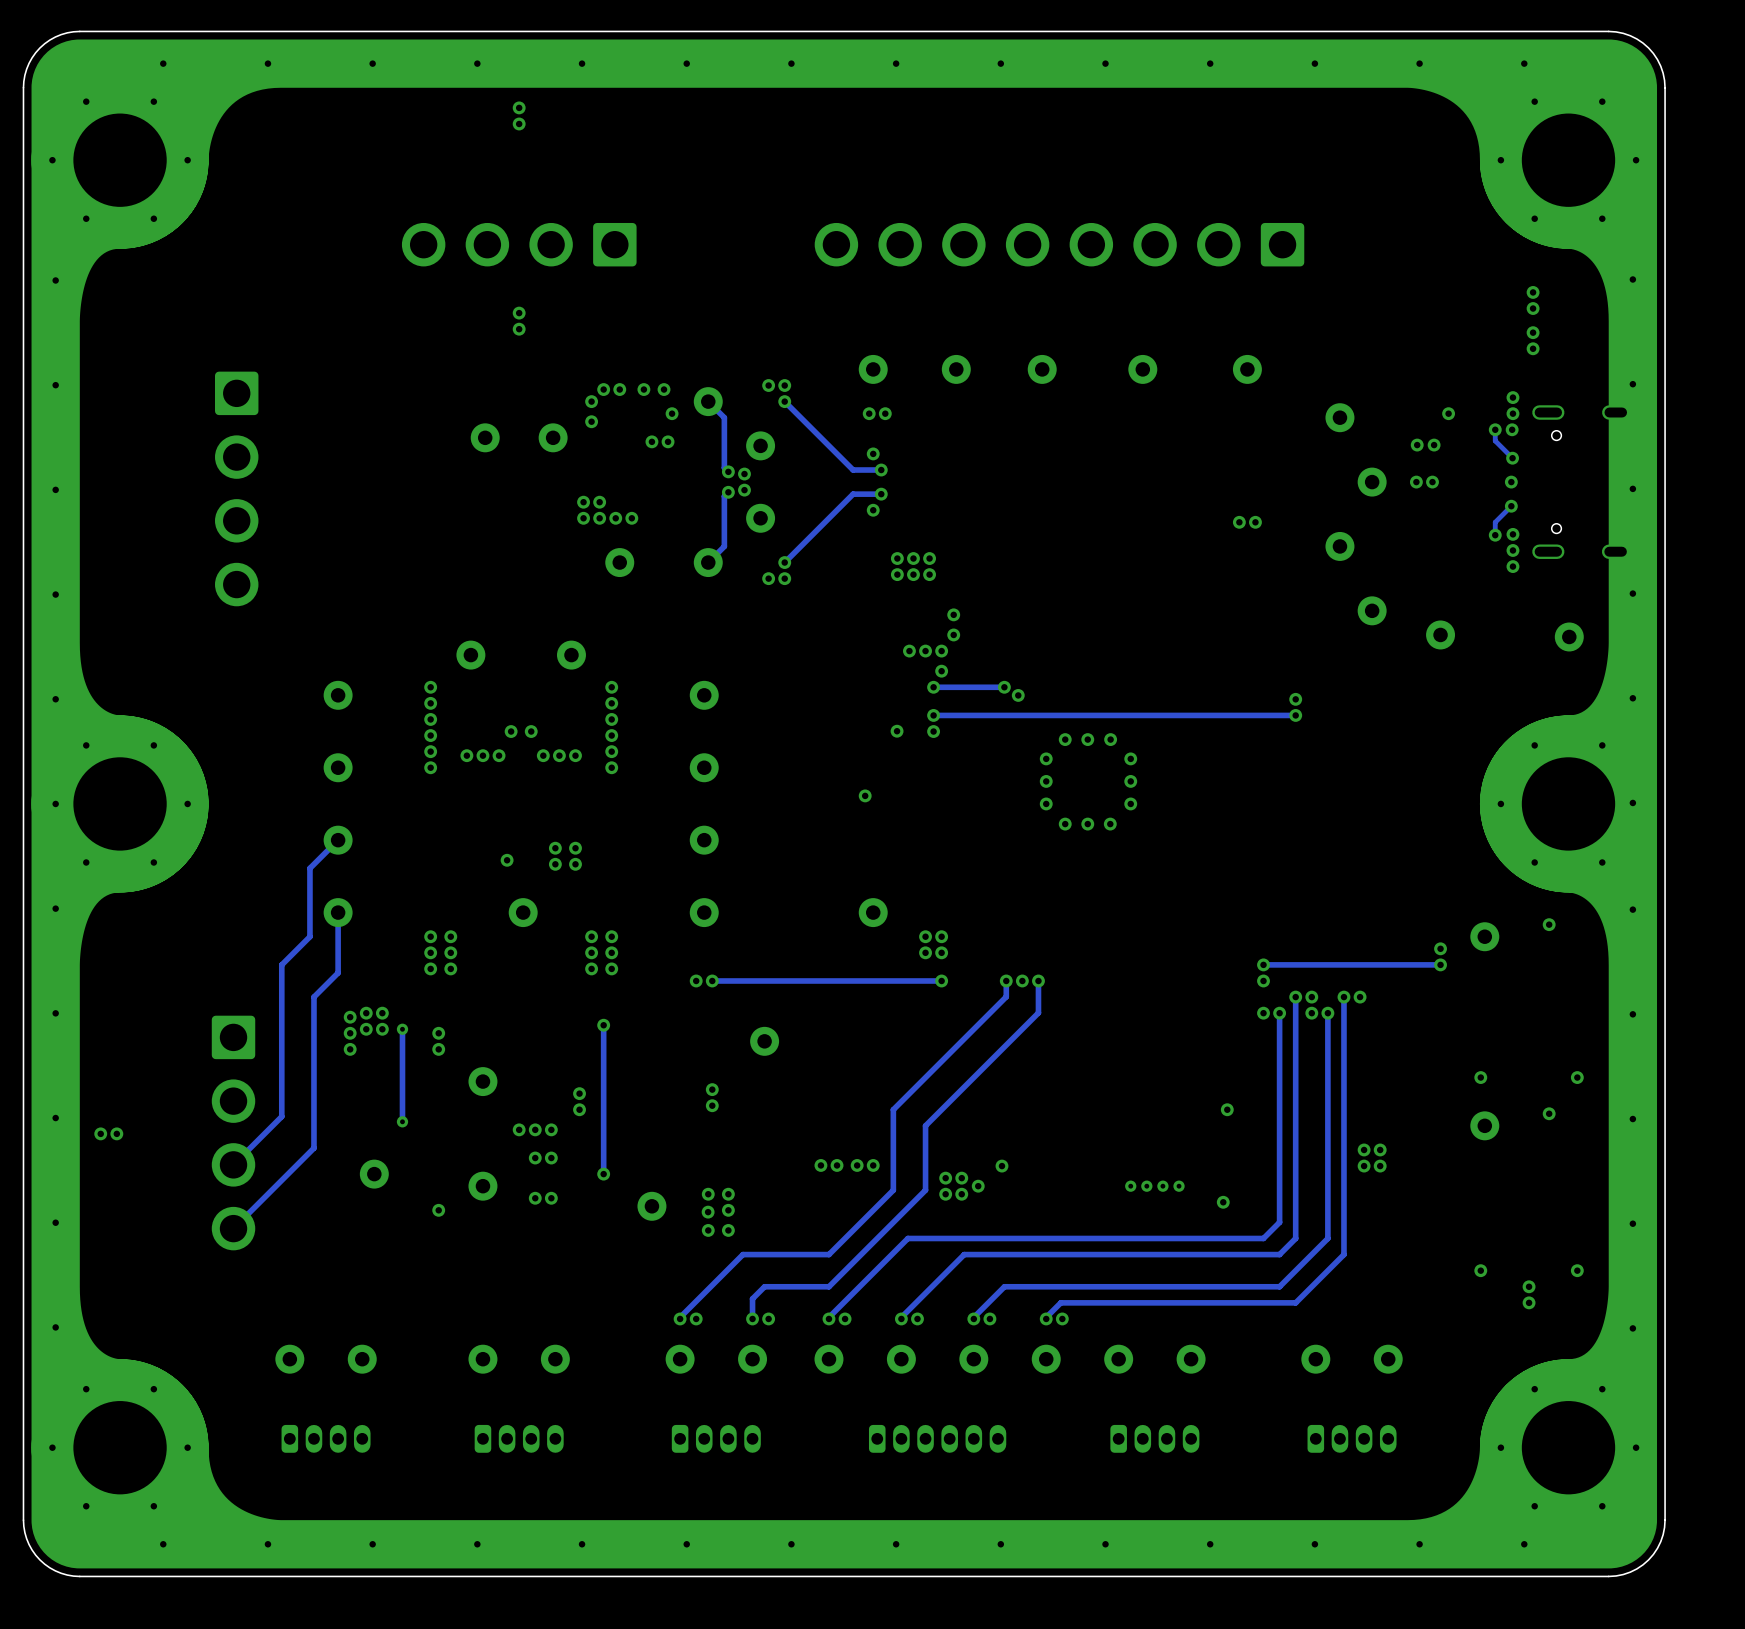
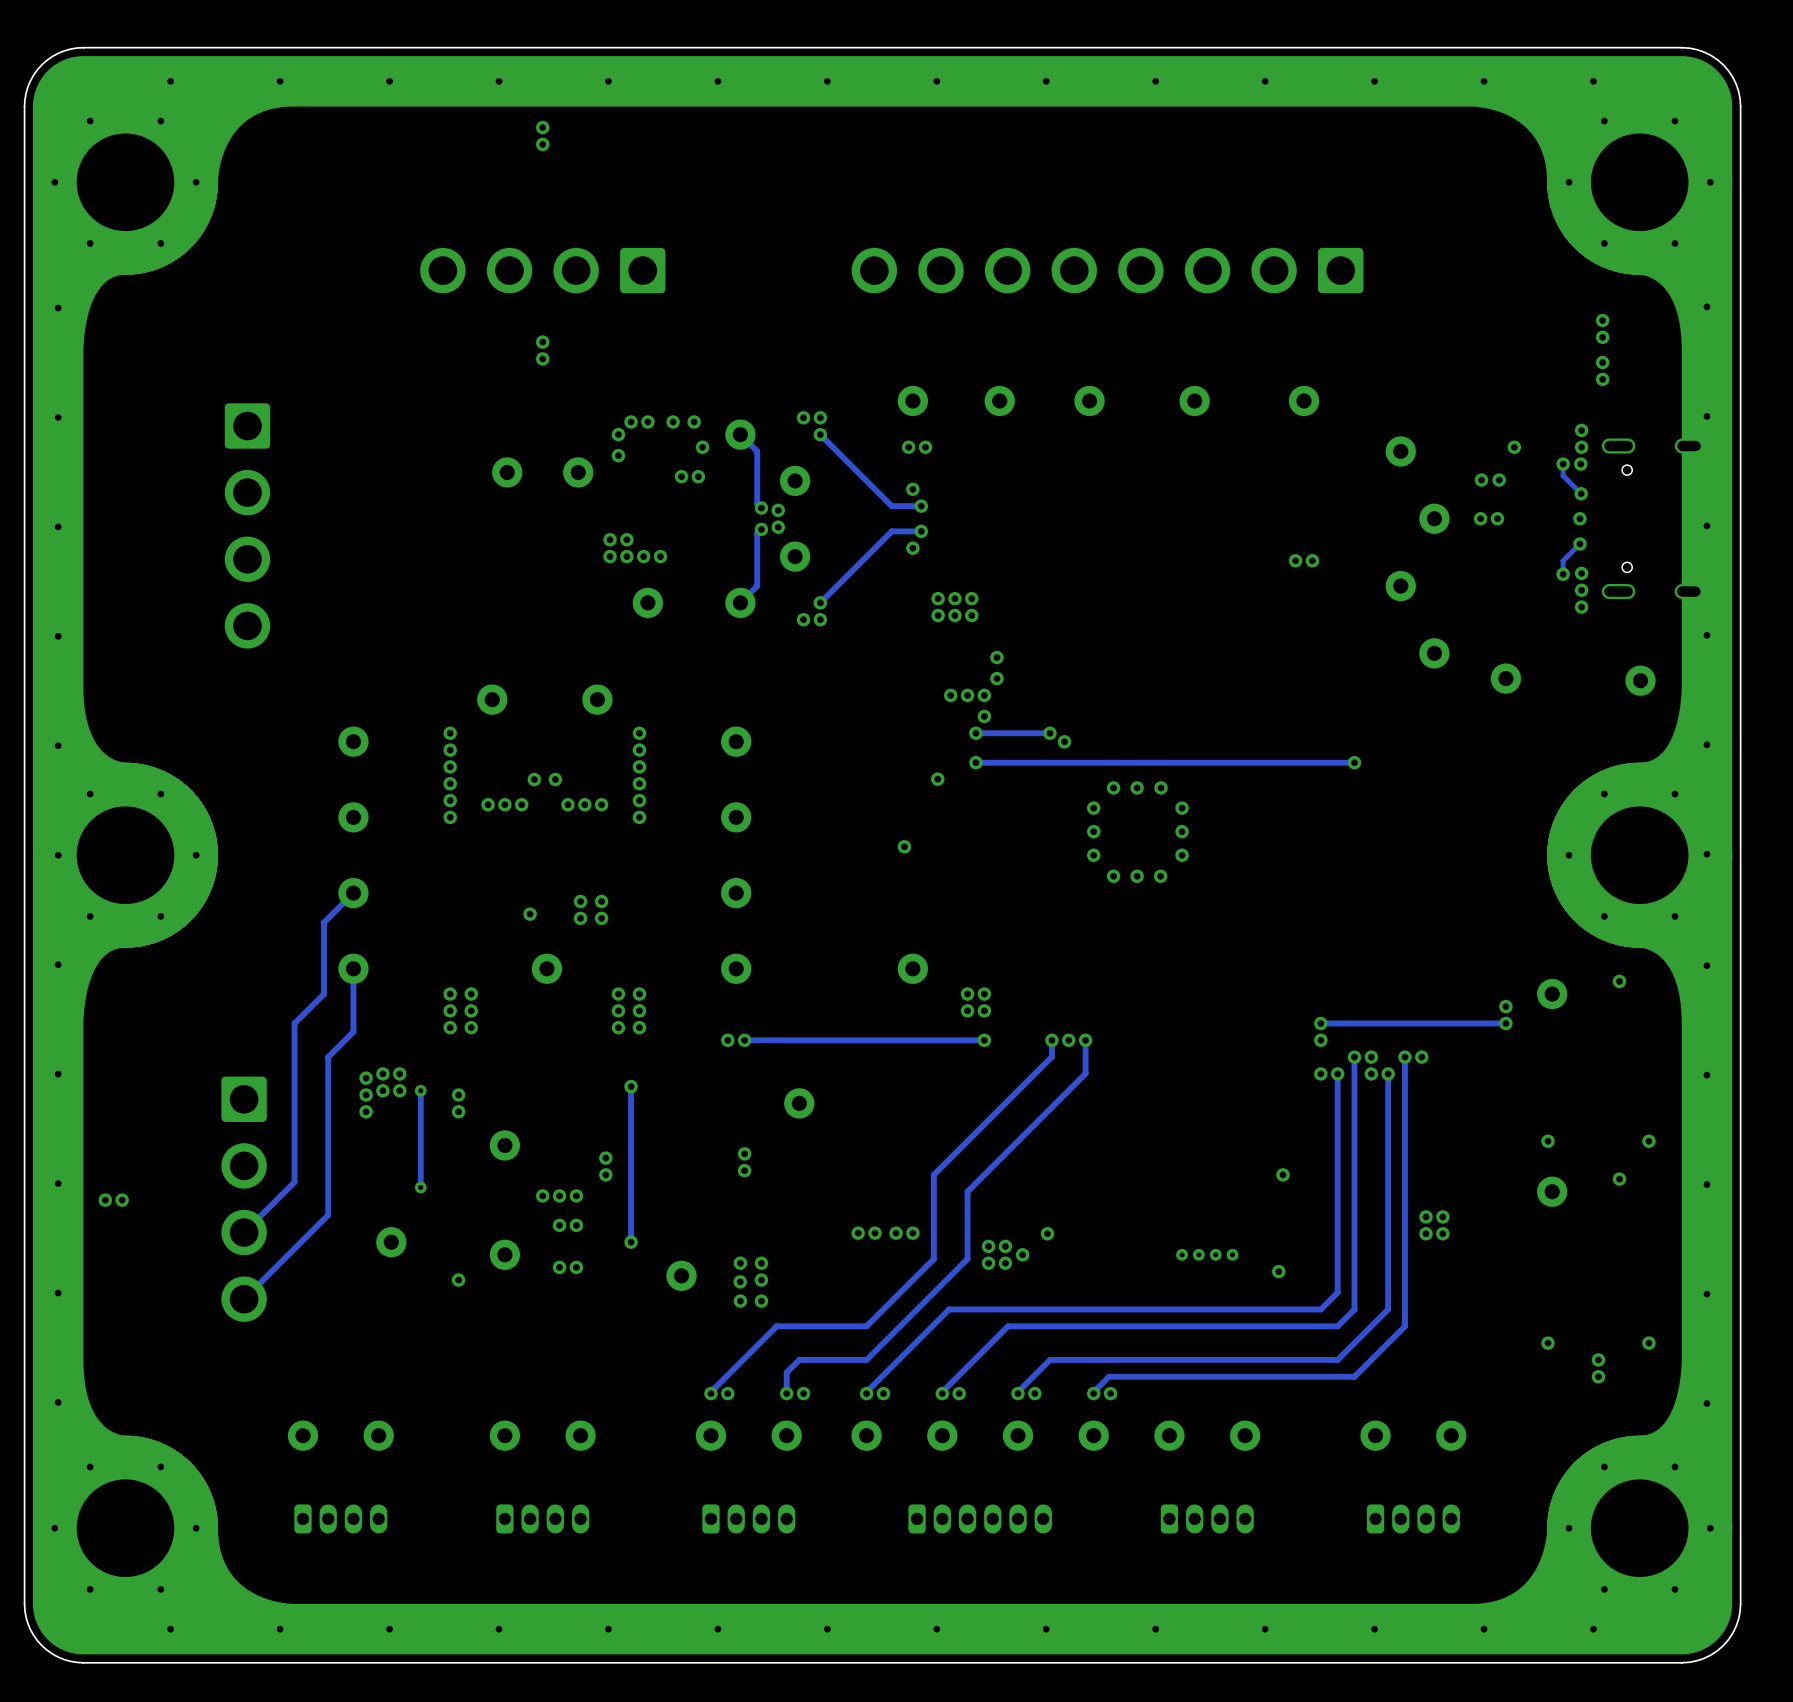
via: (1295, 699) -> none
via: (933, 731) -> none

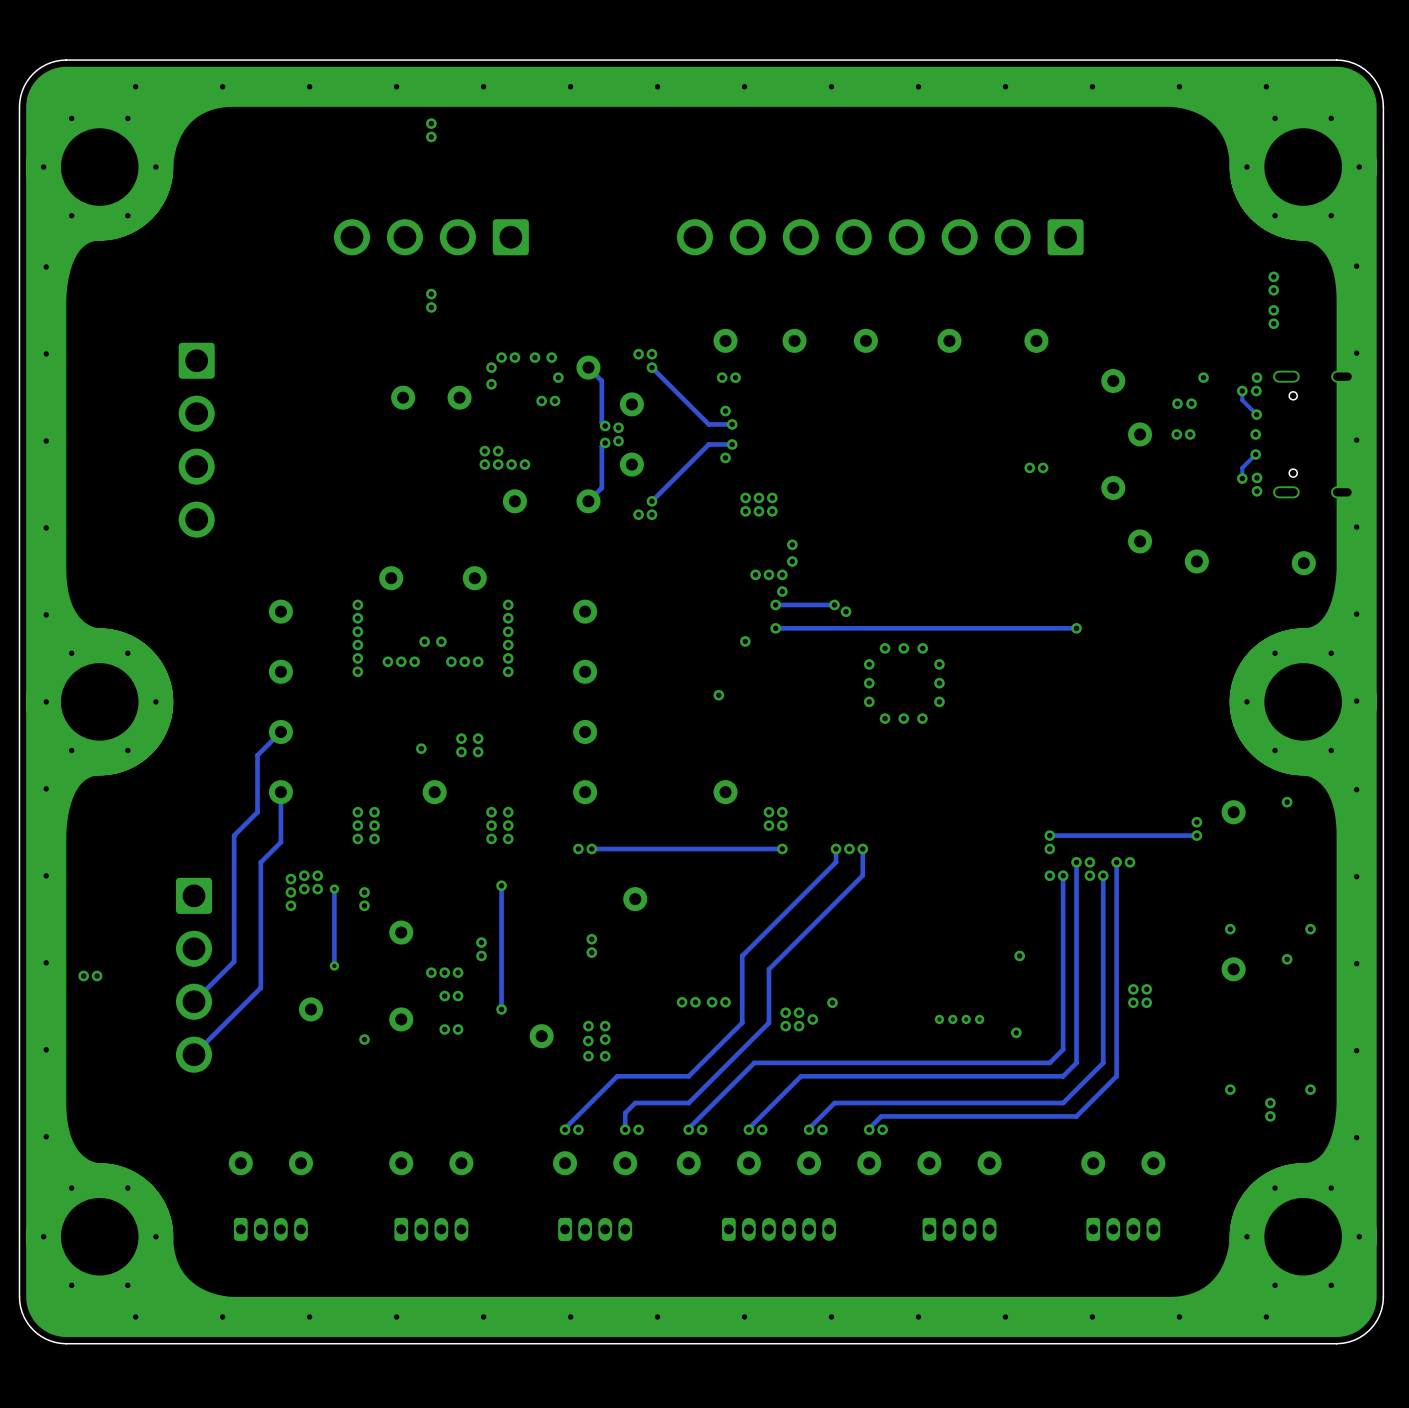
via: (1581, 430) -> none
via: (1581, 607) -> none

